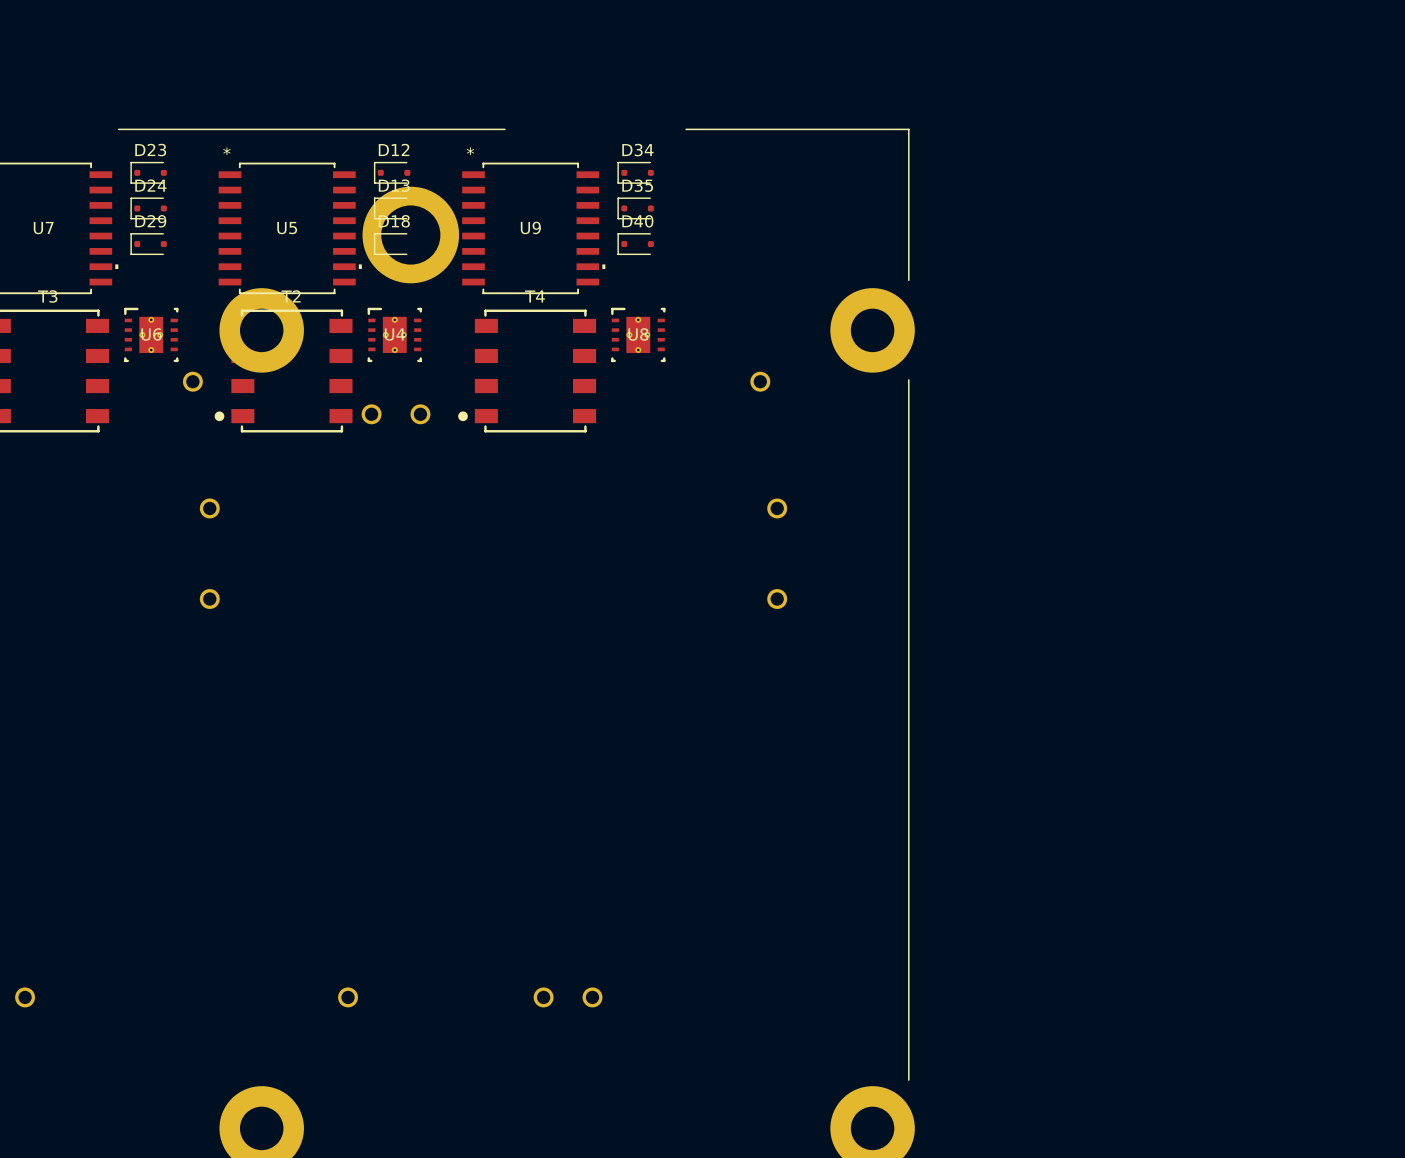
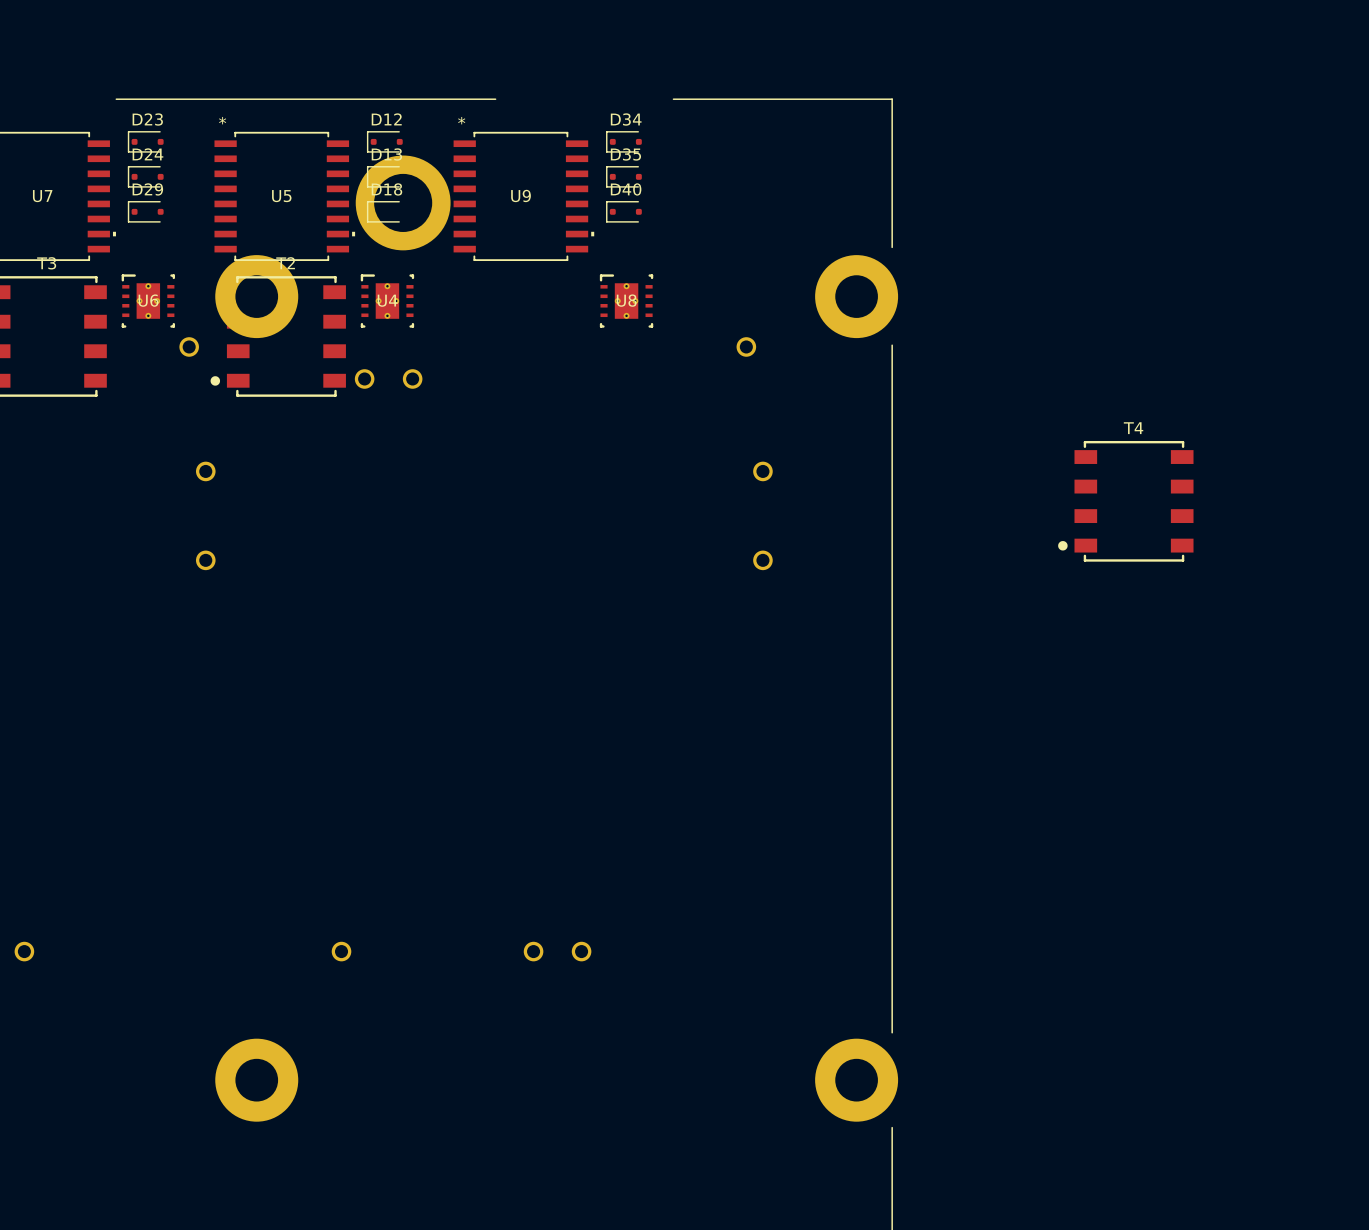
T4 position: (527, 371) -> (1125, 501)

